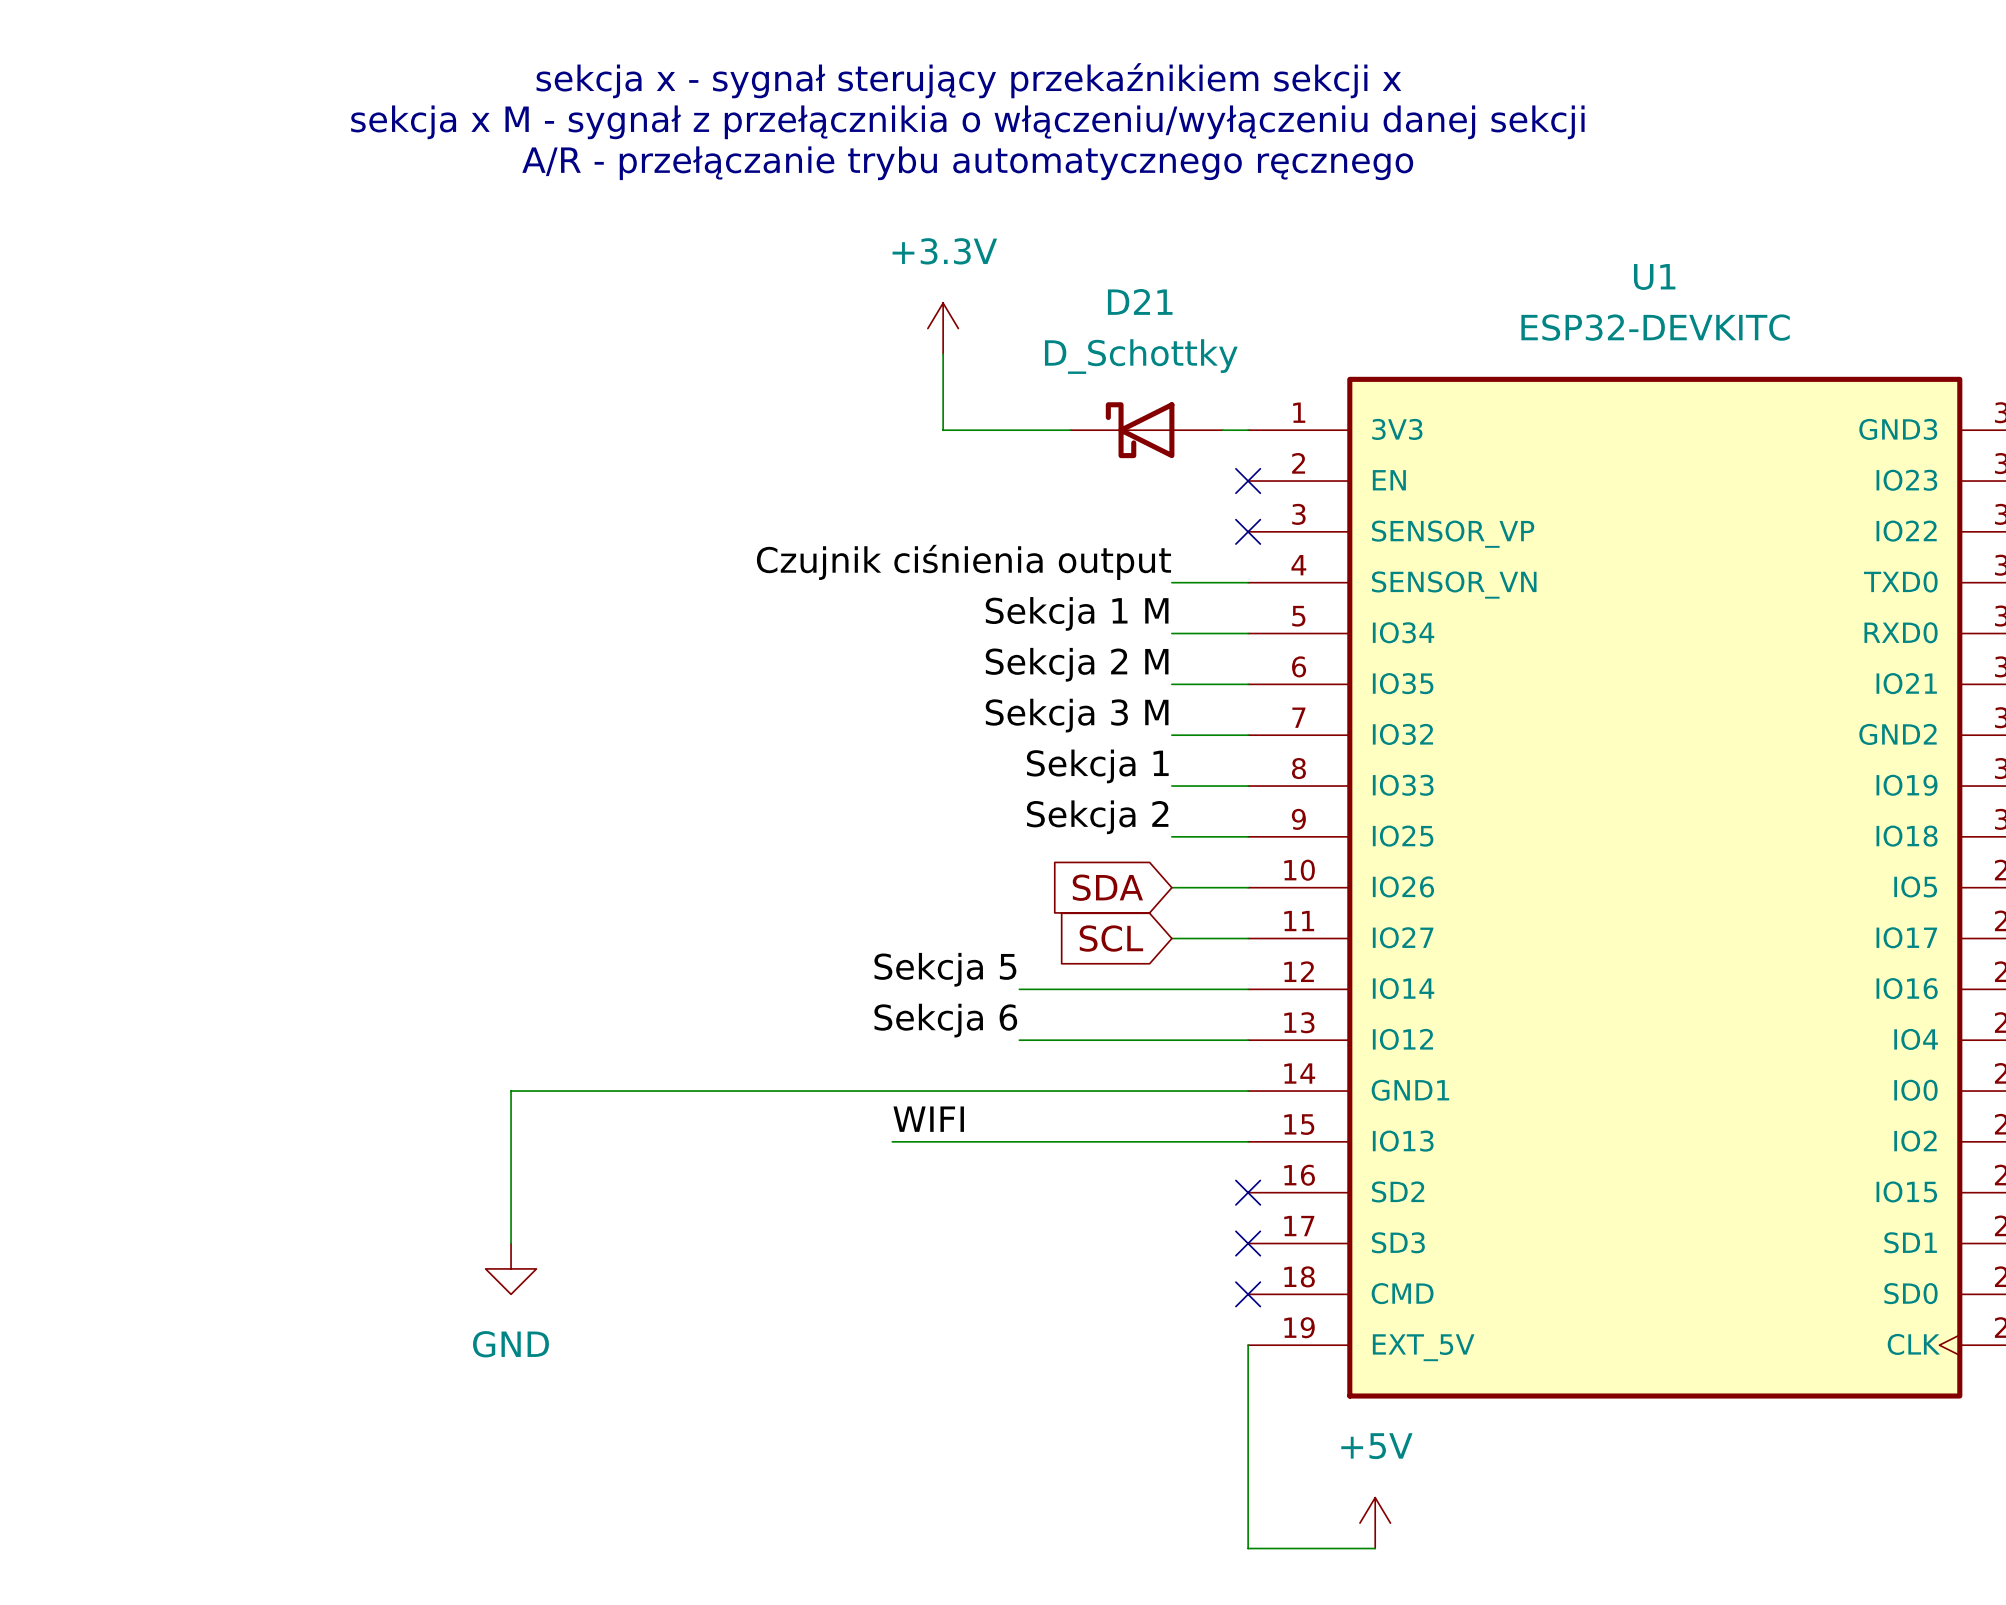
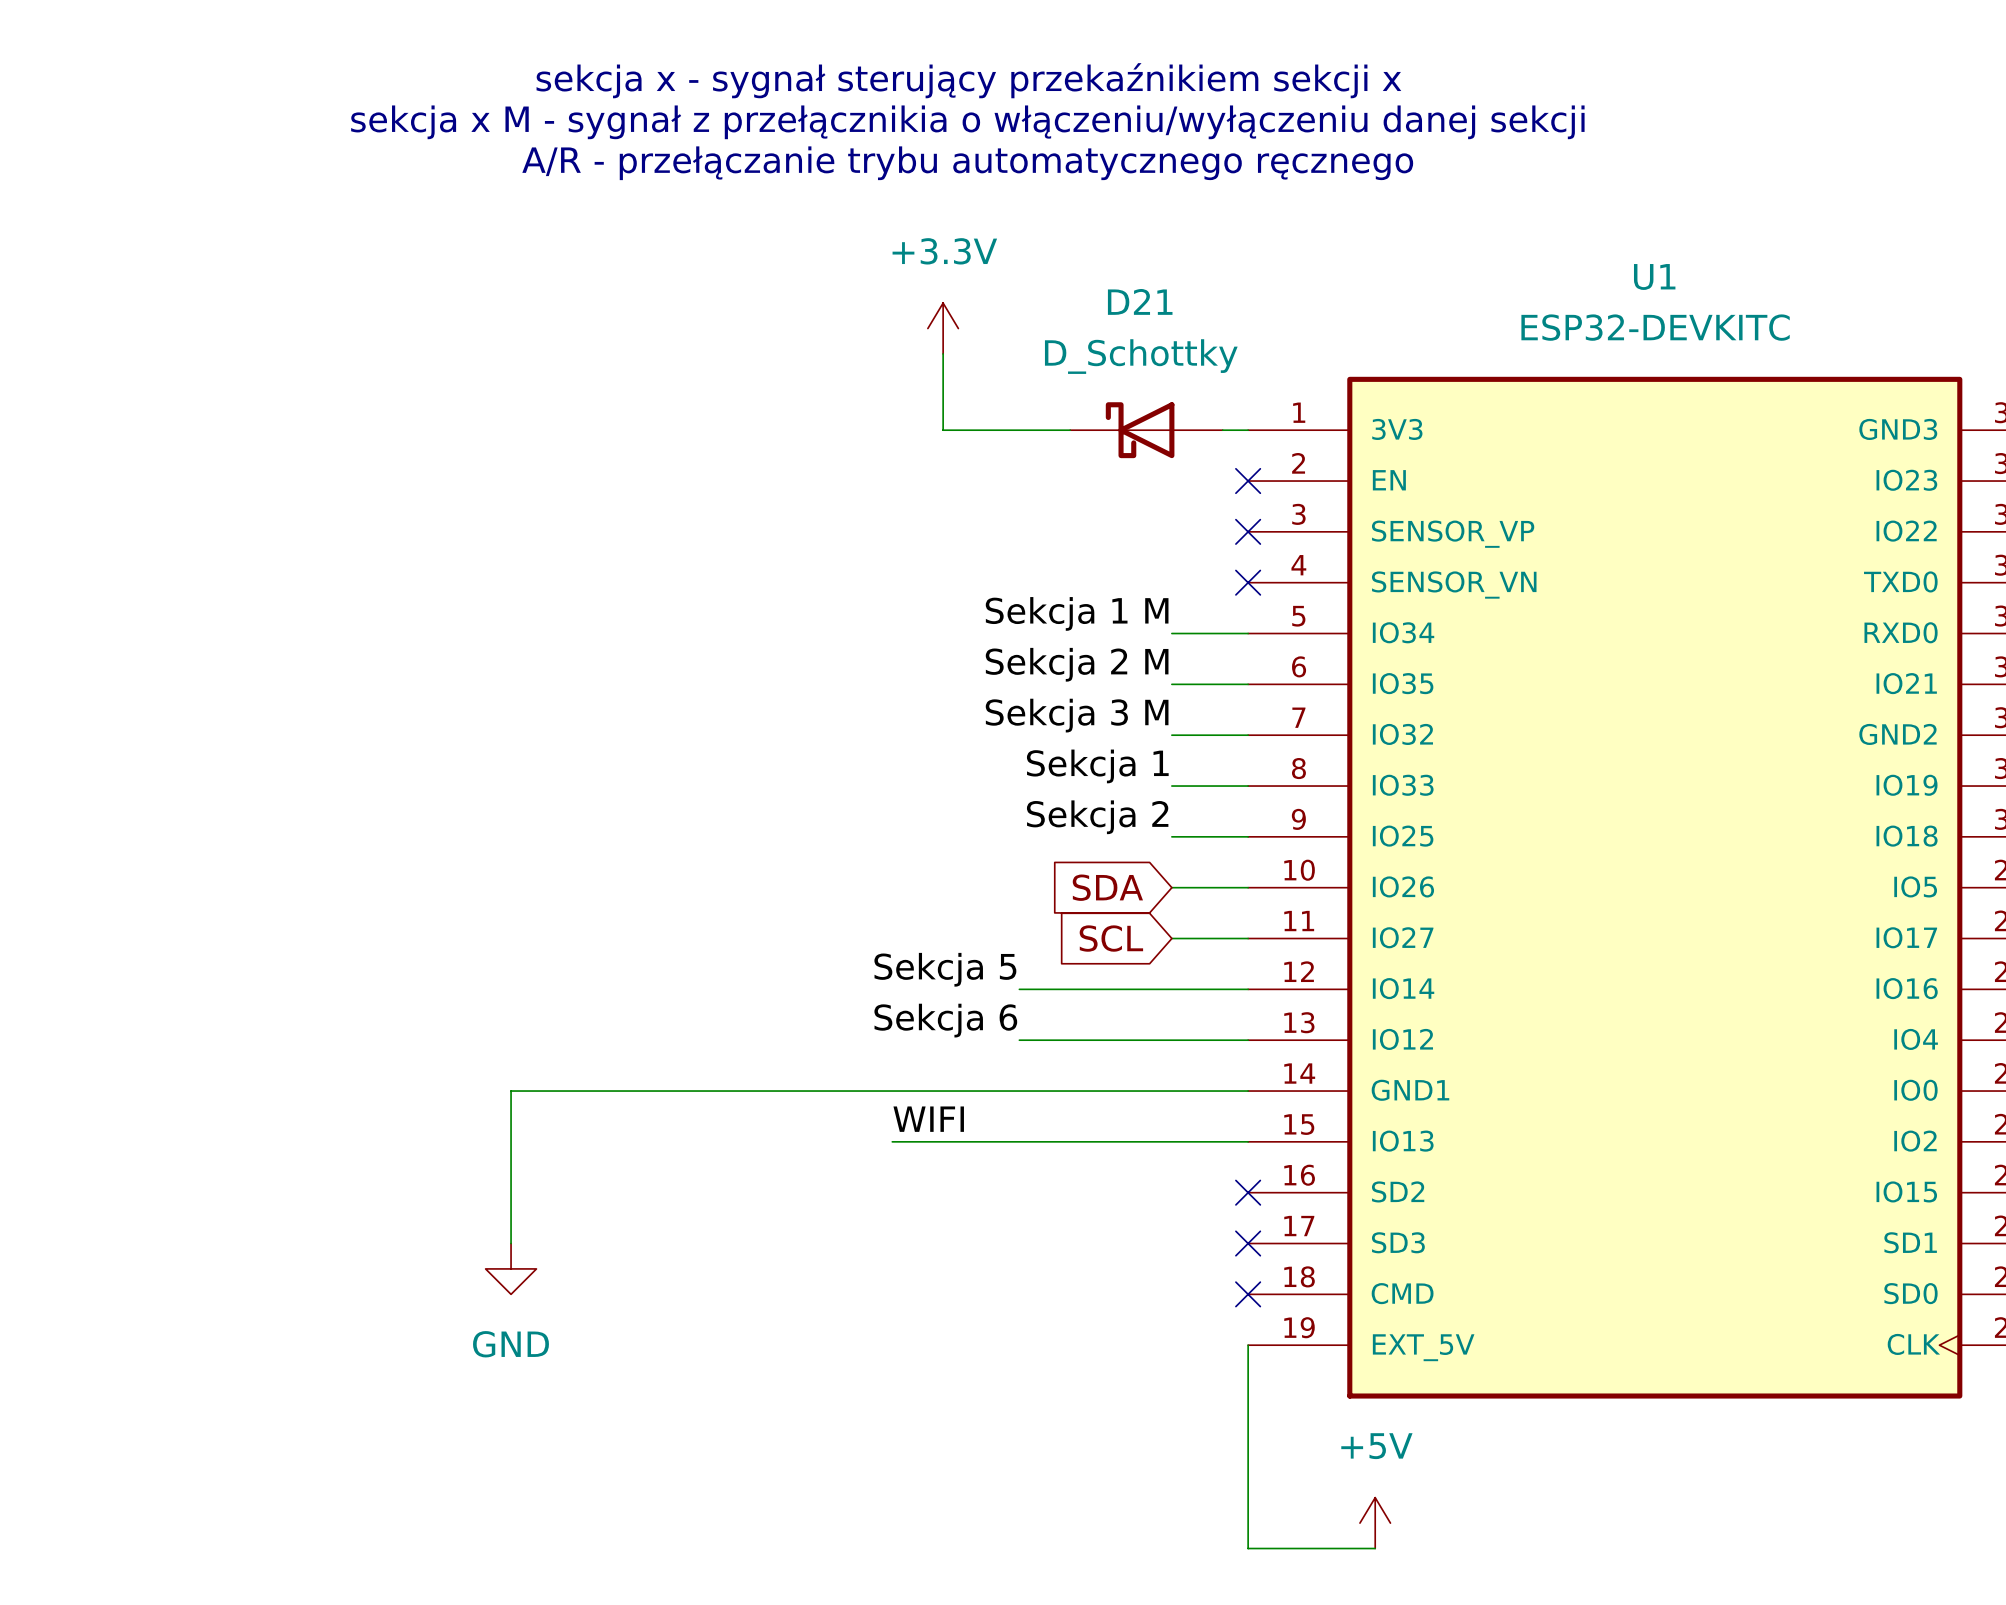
label: Czujnik ciśnienia output (963, 562) -> none
wire: (1171, 582) (1248, 582) -> none
no-connect mark: none -> (1248, 582)

